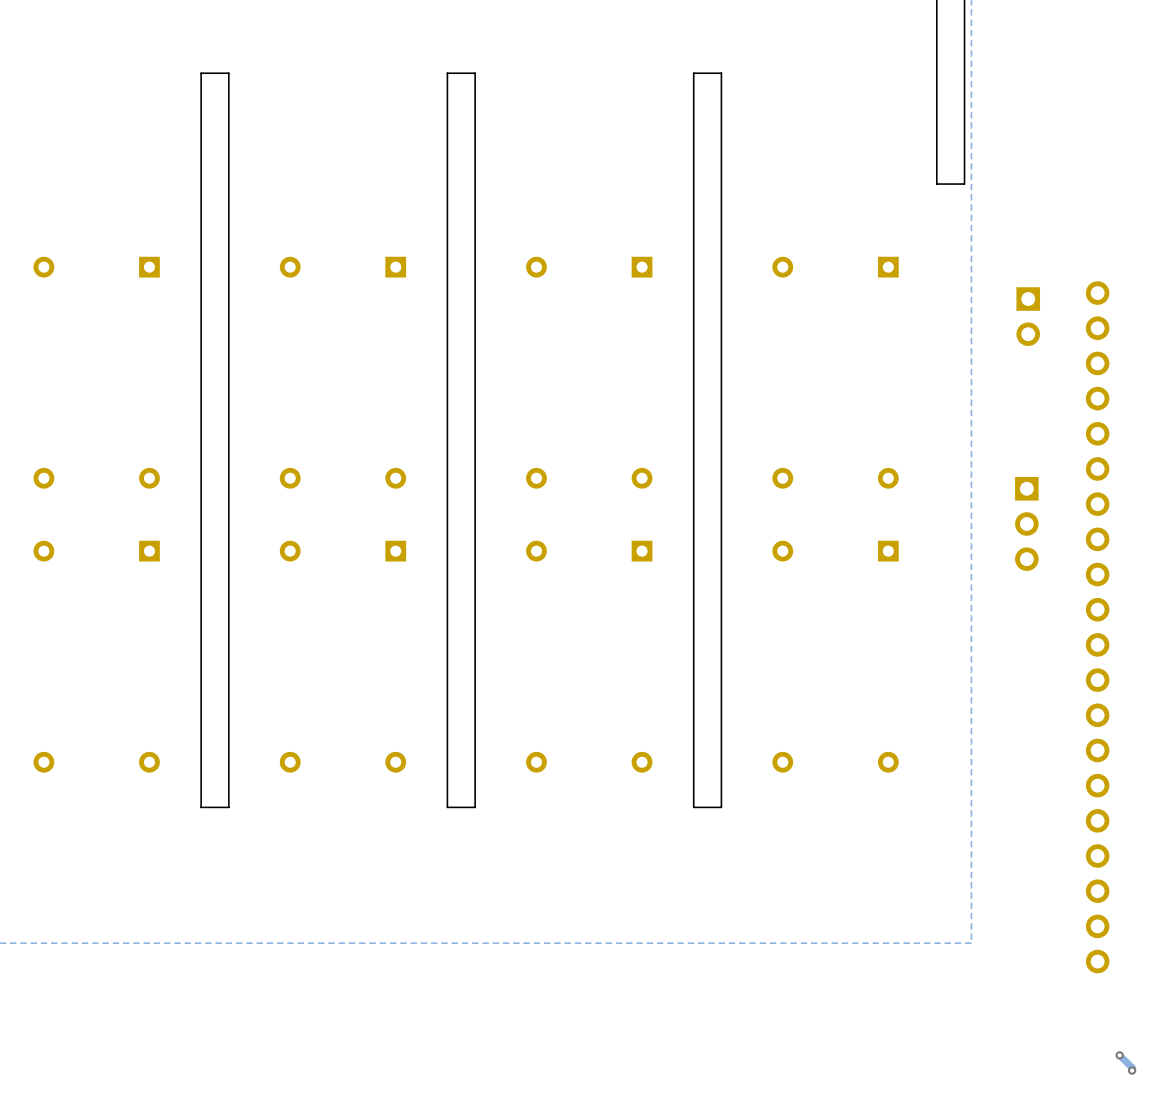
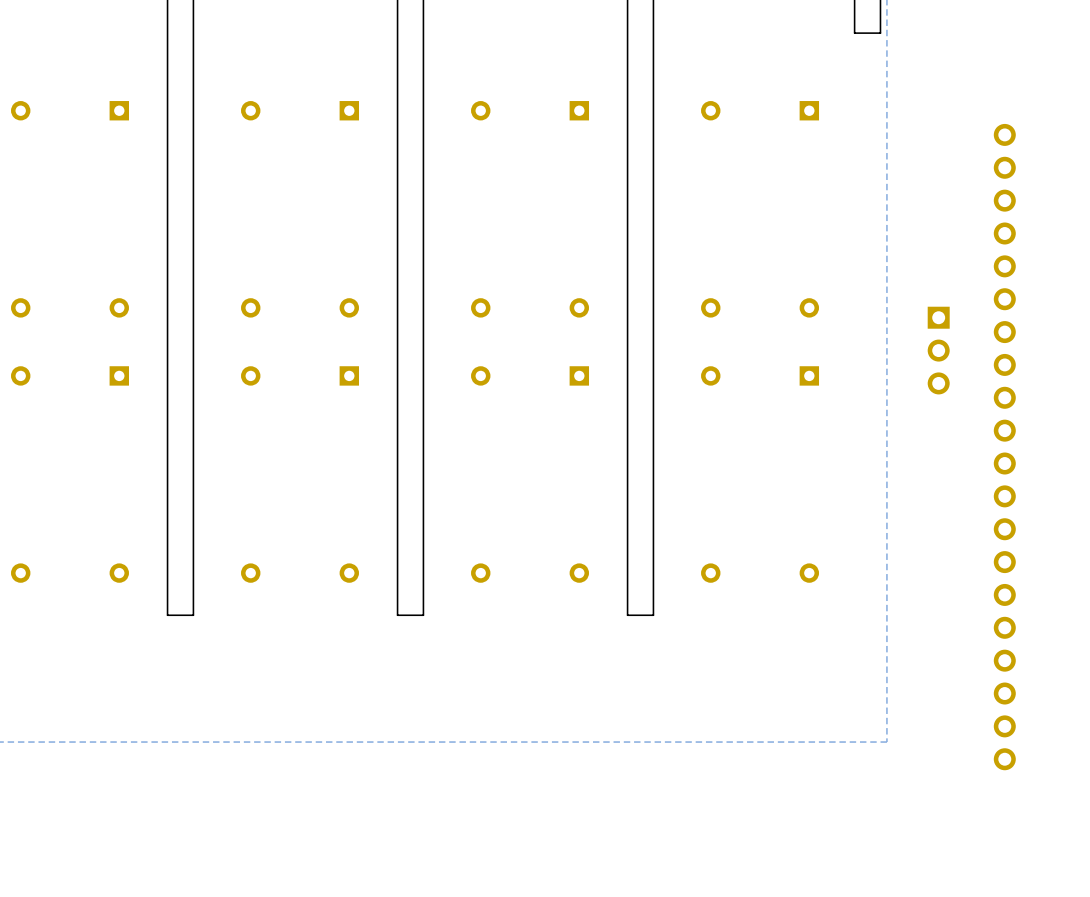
part: (1028, 316) -> none
track: (1119, 1055) (1132, 1067) (1132, 1070) -> none
via: (1119, 1055) -> none
via: (1132, 1070) -> none

